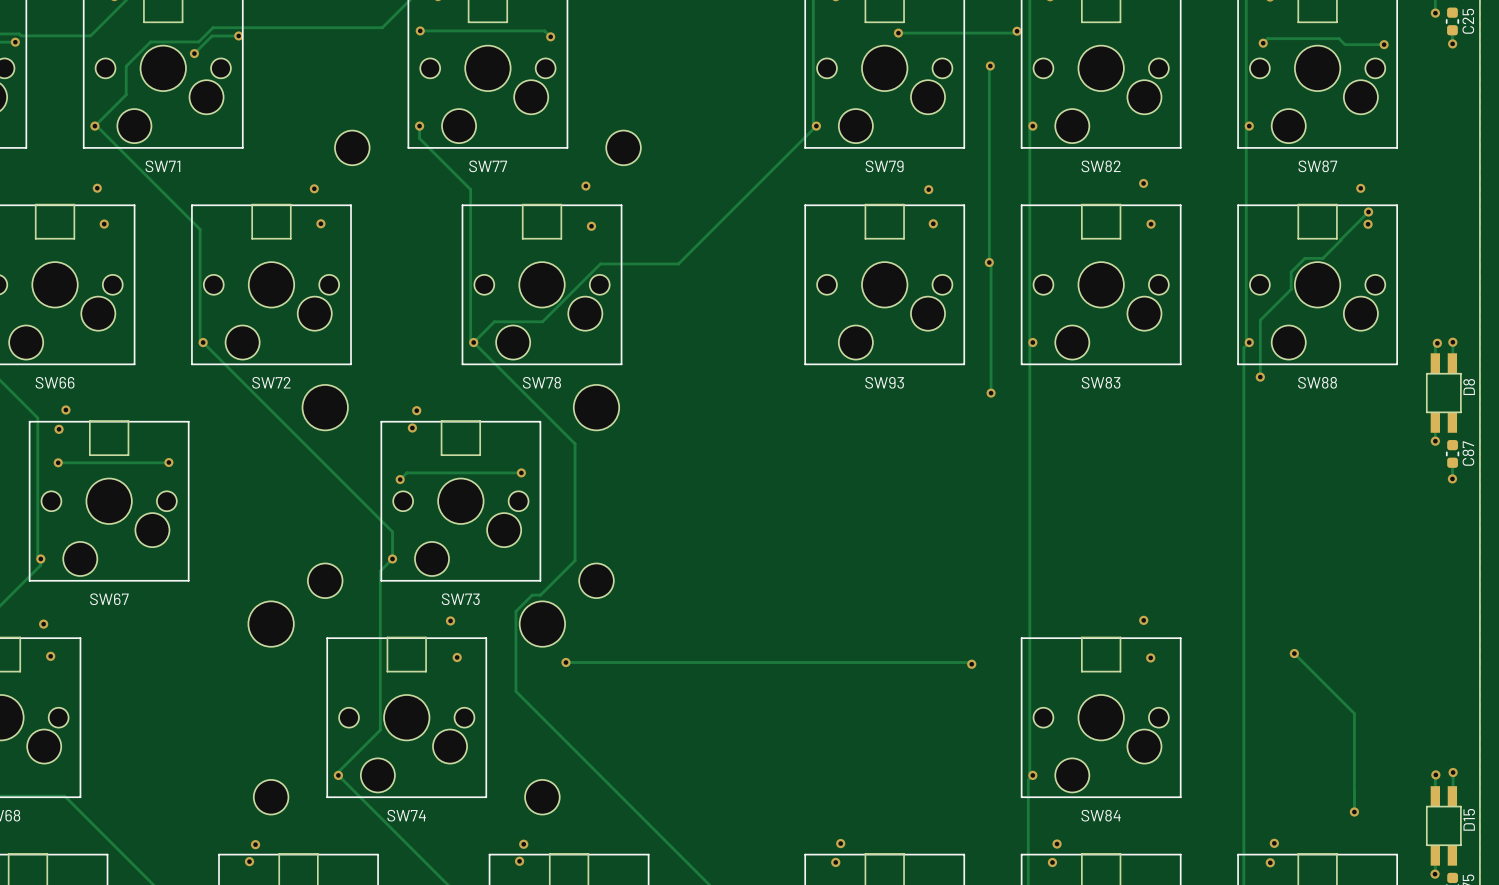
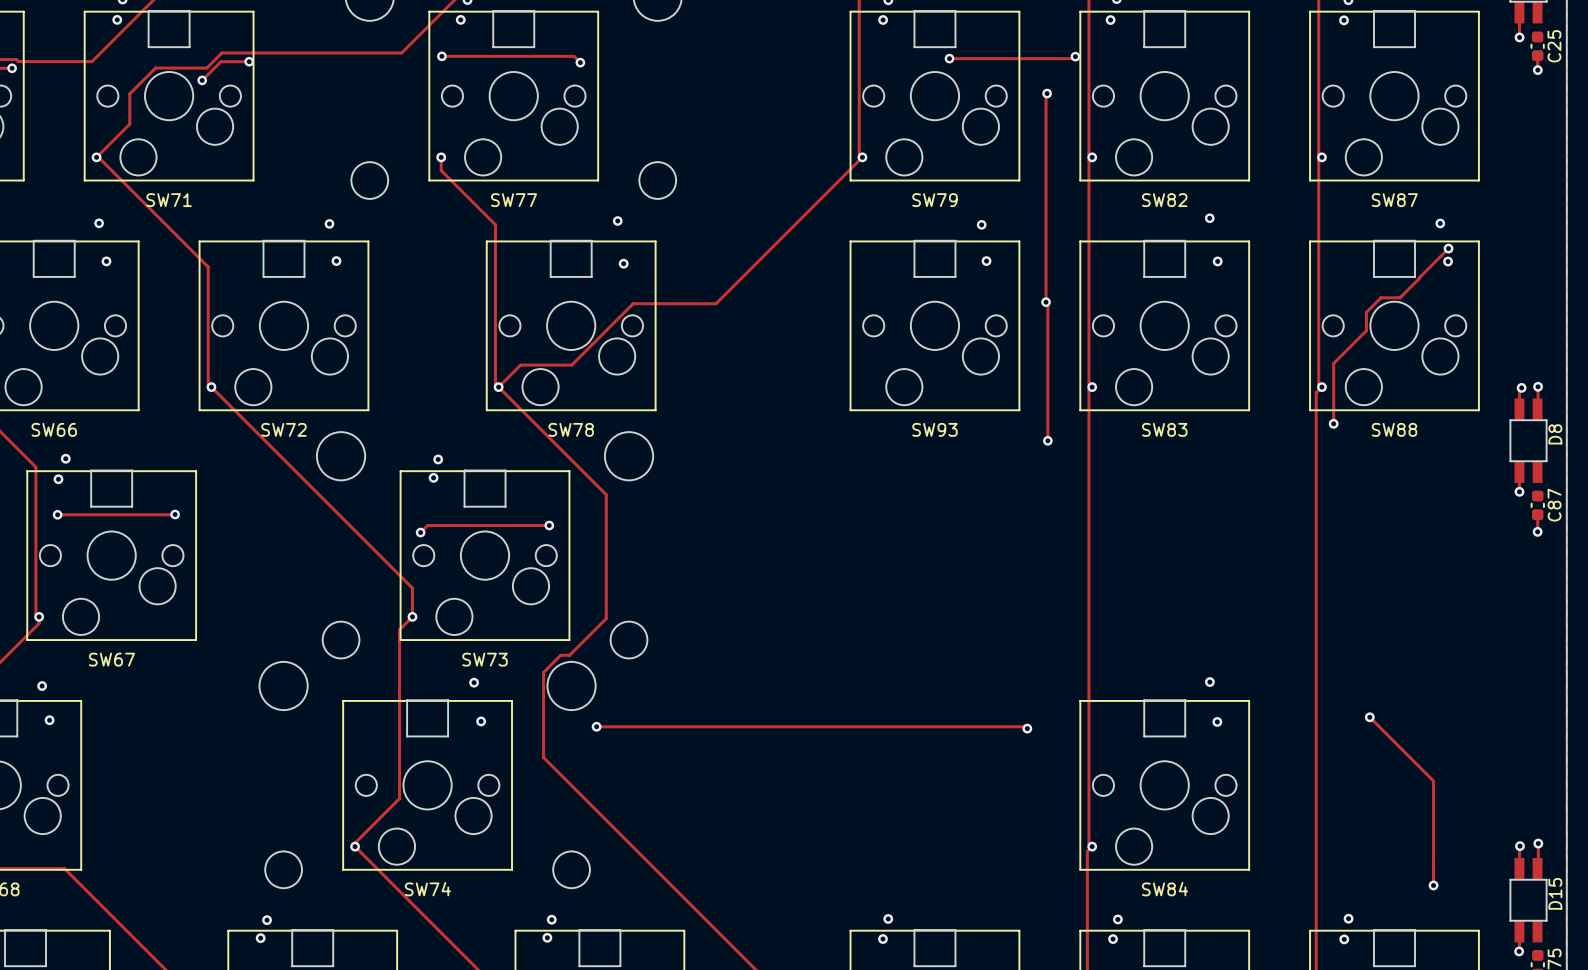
track: (1263, 43) (1267, 38) (1339, 38) (1345, 44) (1384, 44) -> none
via: (1263, 43) -> none
via: (1384, 44) -> none

